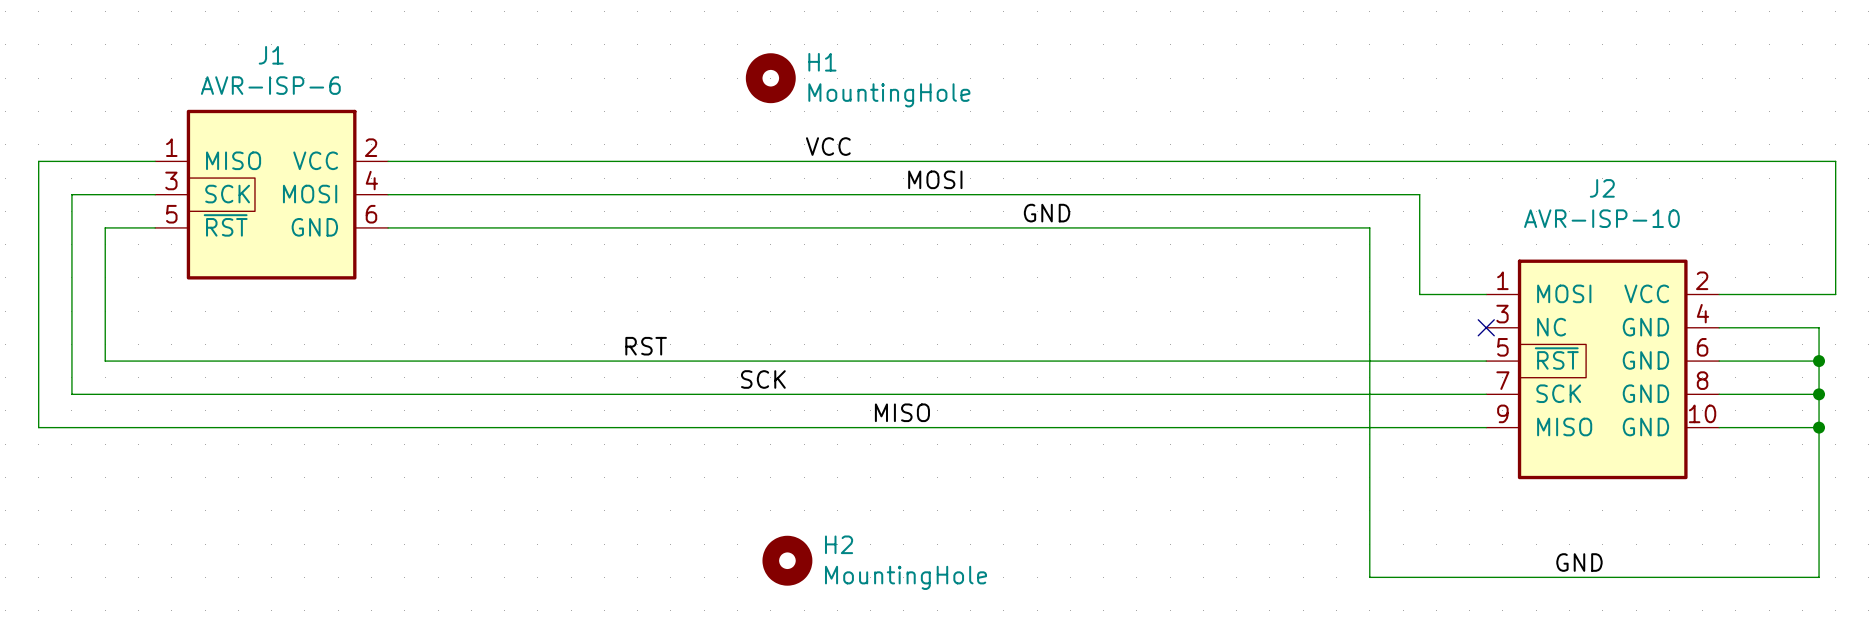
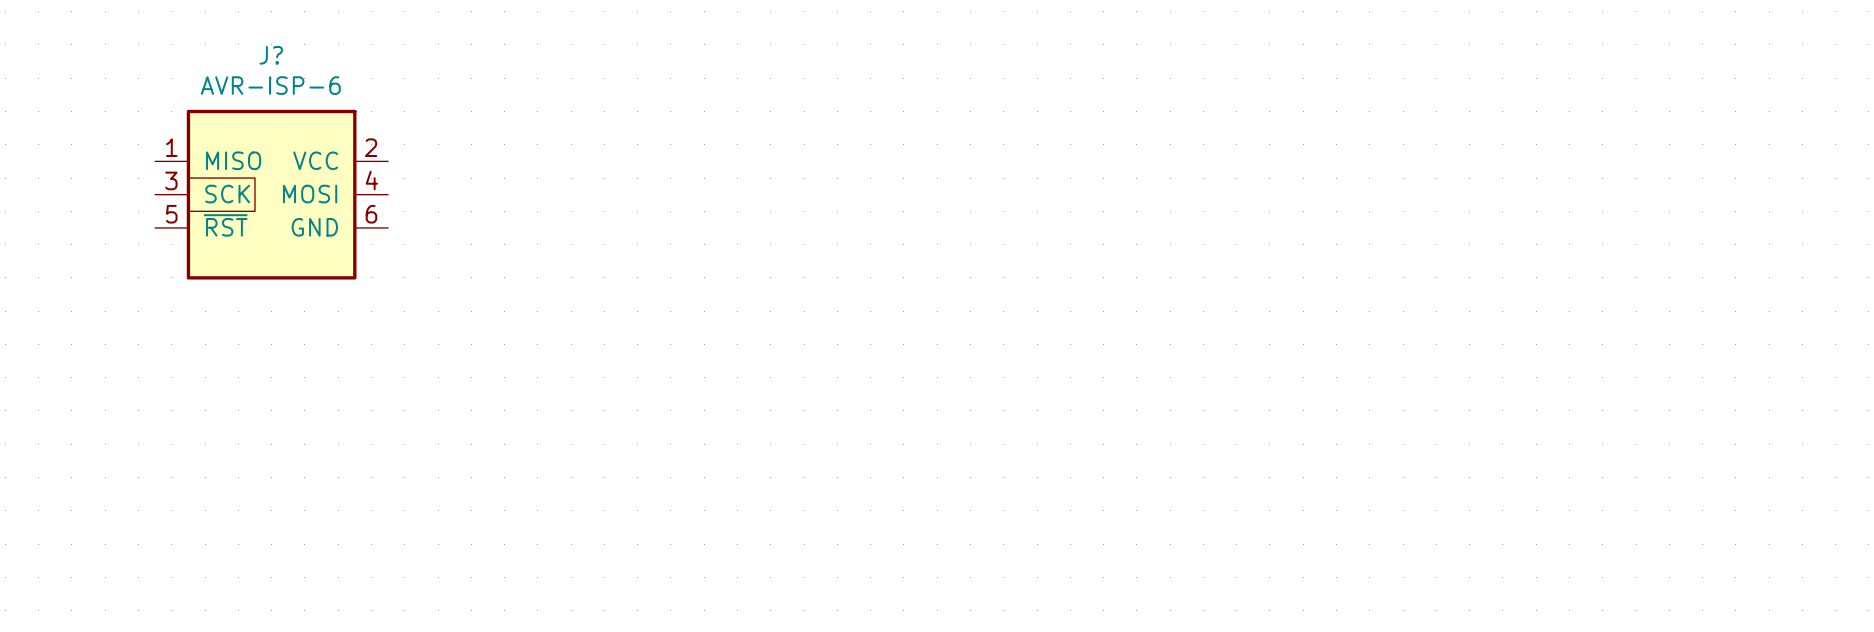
J1 name: J1 (271, 55) -> J? (271, 55)
H1: MountingHole (770, 78) -> none
label: VCC (828, 146) -> none
wire: (155, 161) (38, 161) (38, 427) (1486, 427) -> none
wire: (388, 161) (1835, 161) (1835, 294) (1719, 294) -> none
label: MOSI (935, 179) -> none
wire: (155, 194) (71, 194) (71, 394) (1486, 394) -> none
wire: (388, 194) (1419, 194) (1419, 294) (1486, 294) -> none
label: GND (1047, 213) -> none
wire: (155, 227) (105, 227) (105, 361) (1486, 361) -> none
wire: (388, 227) (1369, 227) (1369, 577) (1819, 577) (1819, 327) (1719, 327) -> none
no-connect mark: (1486, 327) -> none
label: RST (646, 346) -> none
wire: (1719, 361) (1819, 361) -> none
junction: (1819, 361) -> none
J2: AVR-ISP-10 (1602, 369) -> none
label: SCK (763, 379) -> none
wire: (1719, 394) (1819, 394) -> none
junction: (1819, 394) -> none
label: MISO (902, 412) -> none
wire: (1719, 427) (1819, 427) -> none
junction: (1819, 427) -> none
H2: MountingHole (787, 560) -> none
label: GND (1579, 562) -> none

